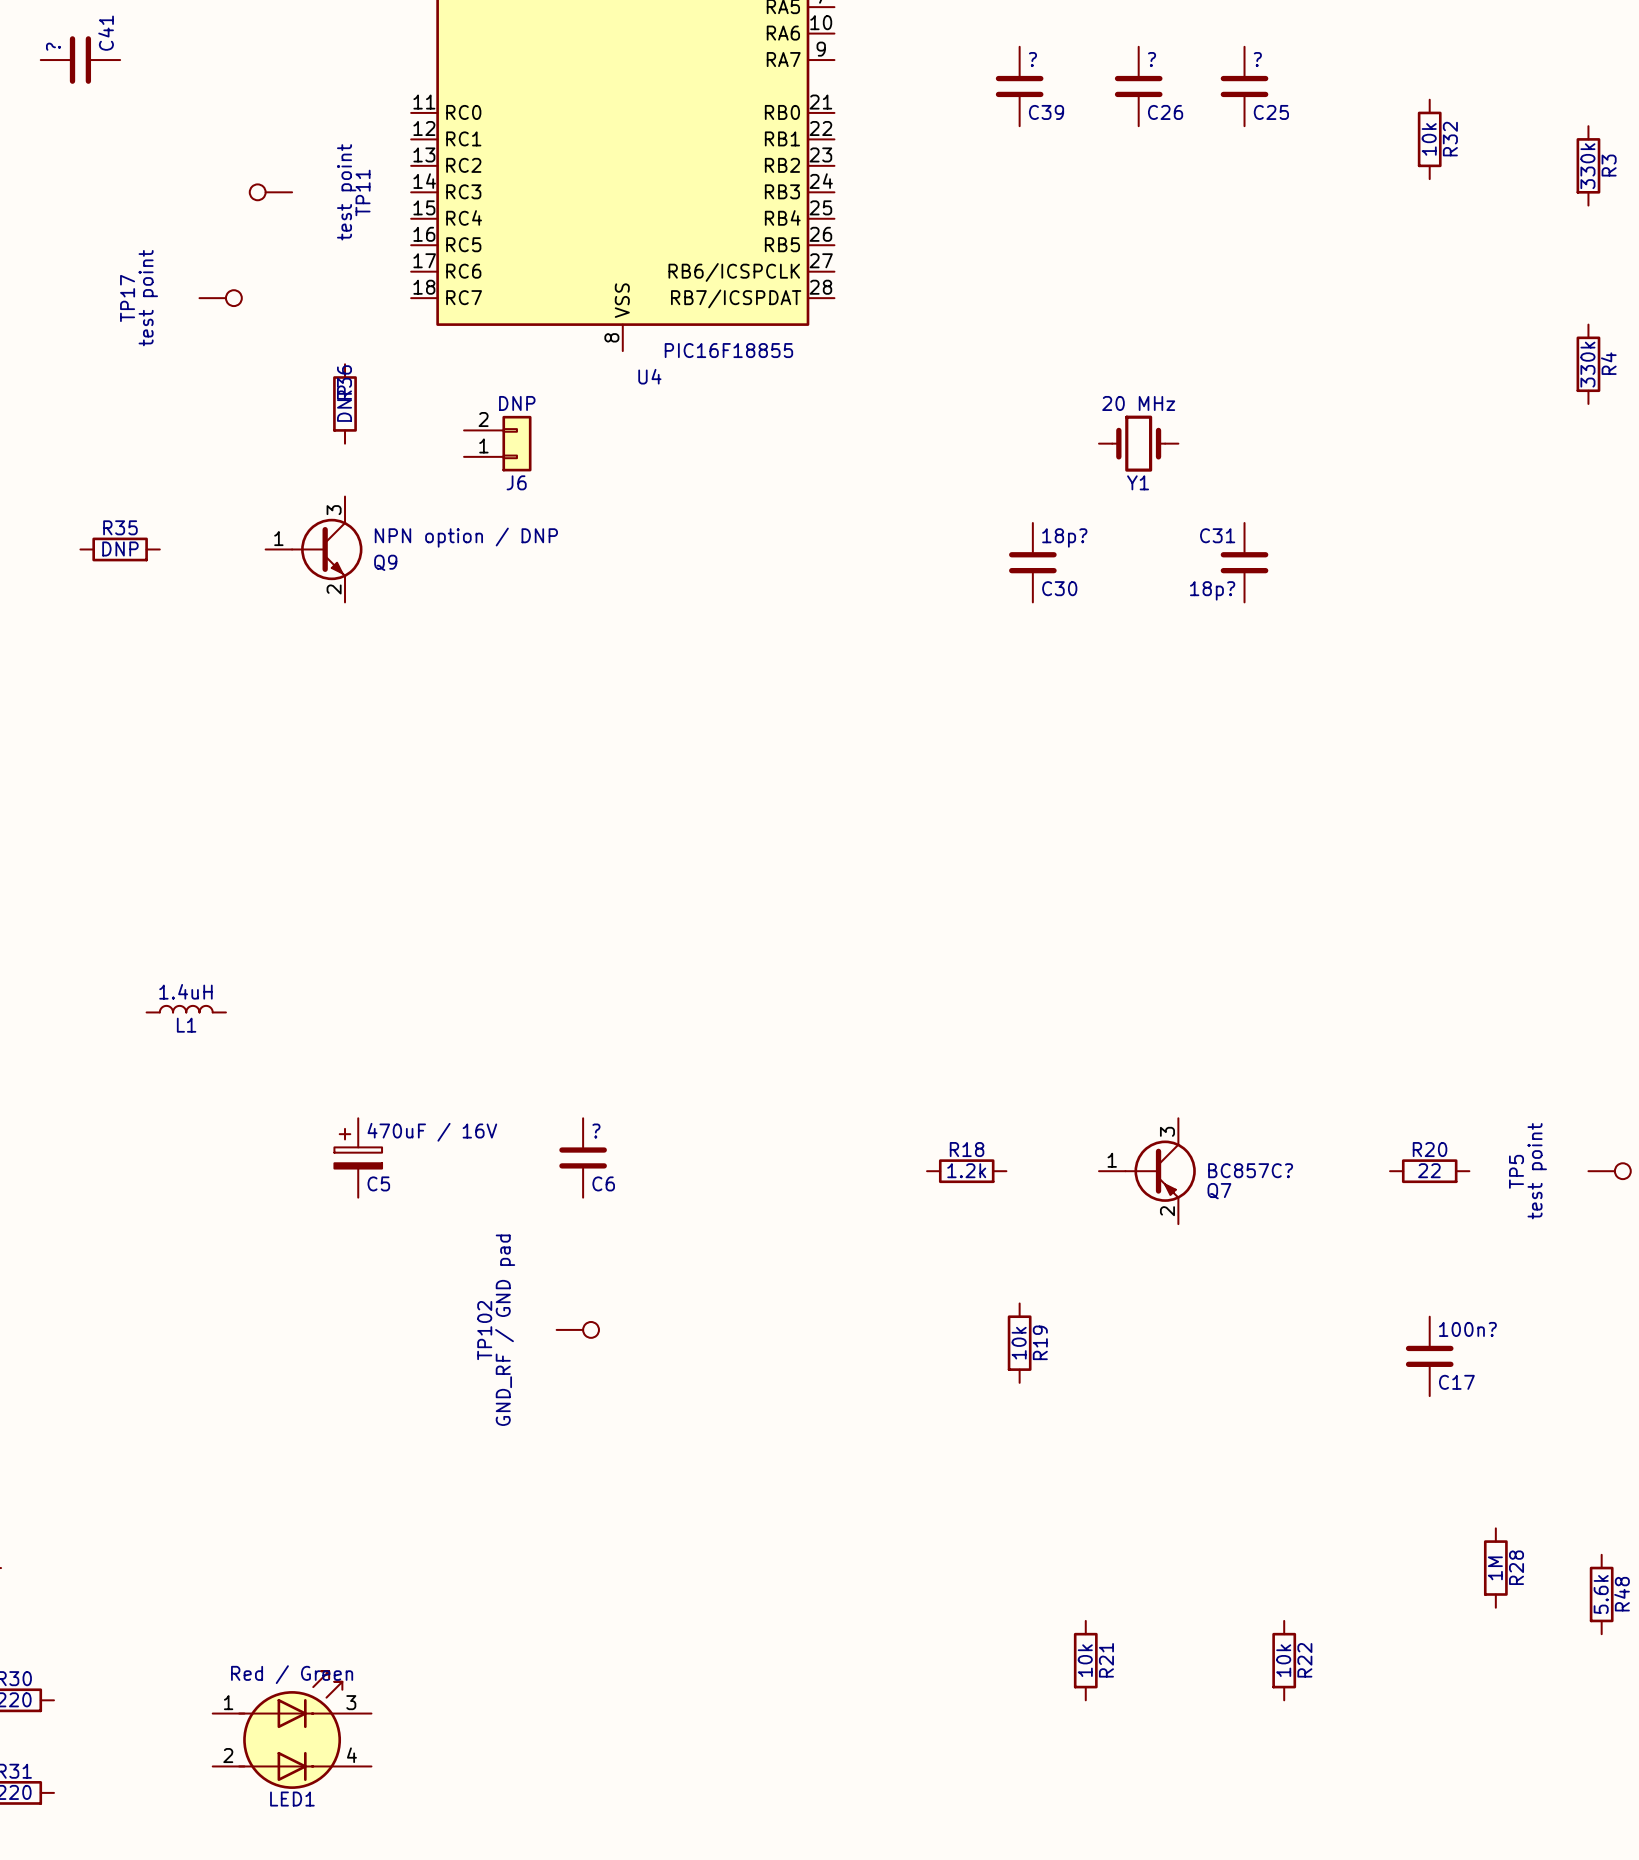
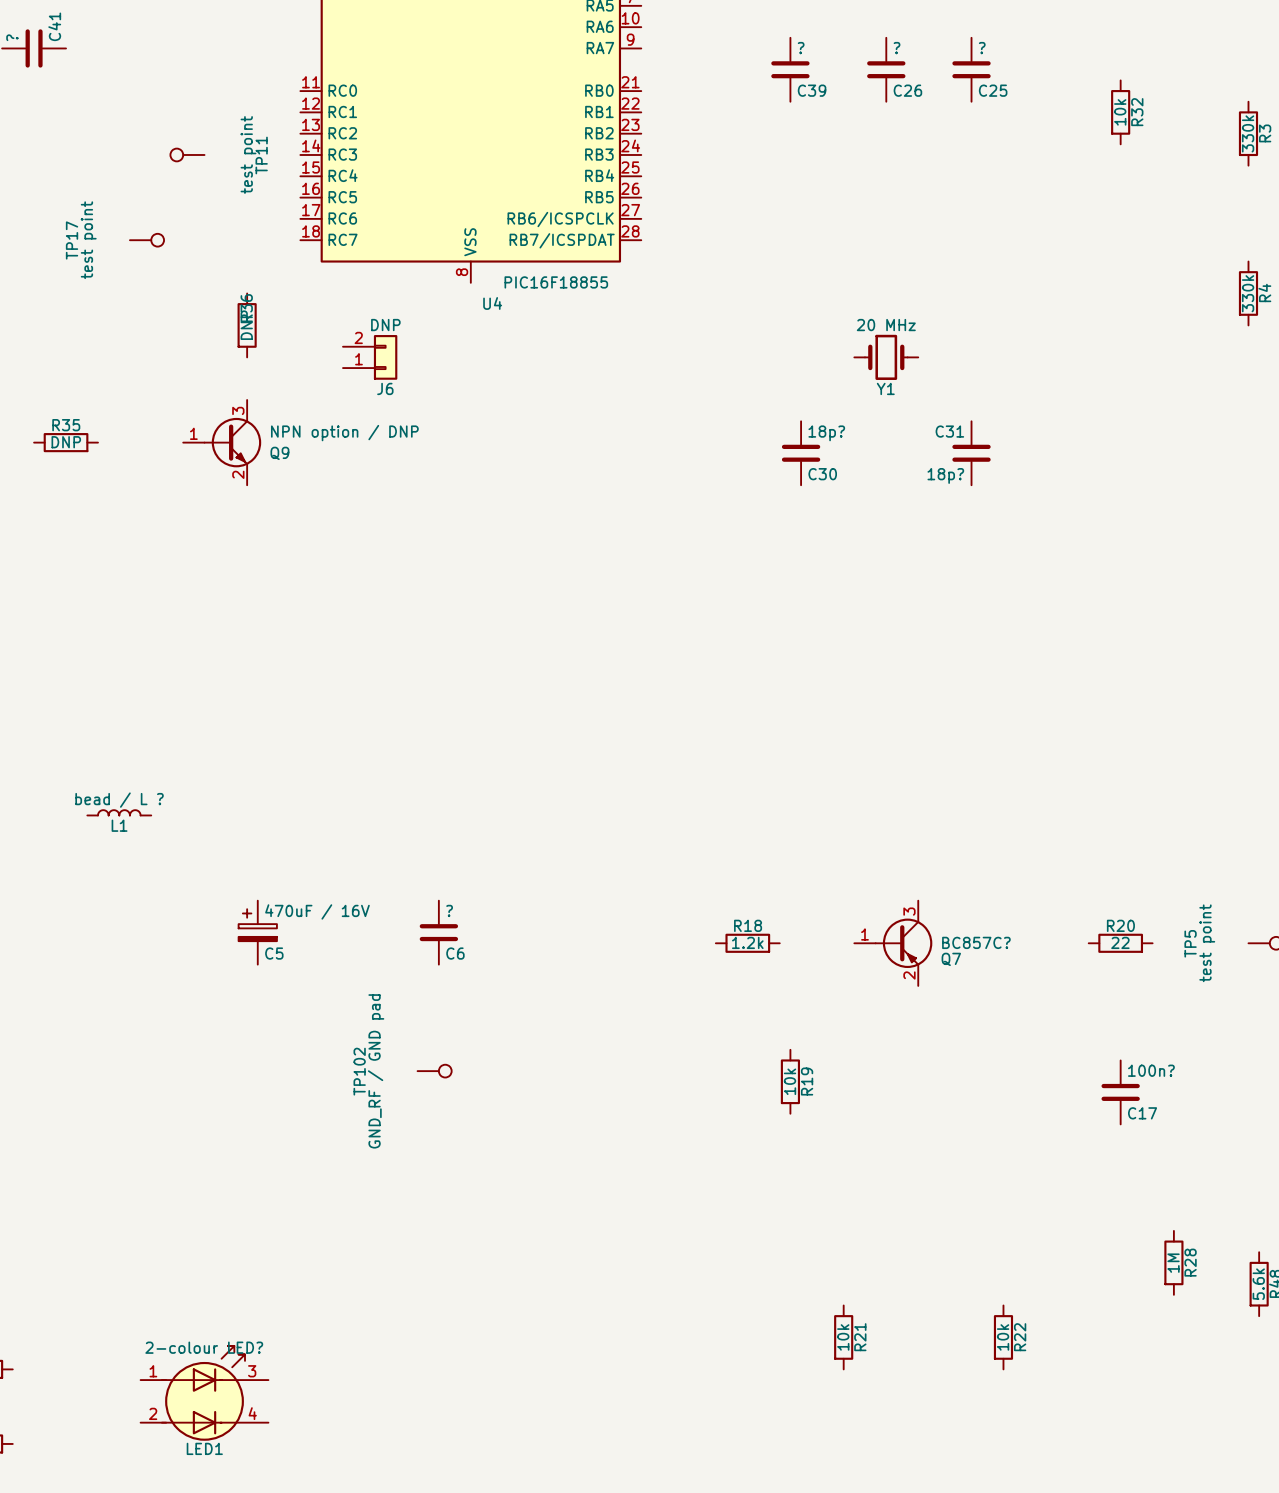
L1 value: 1.4uH (185, 991) -> bead / L ? (119, 800)
LED1 value: Red / Green (292, 1674) -> 2-colour LED? (204, 1347)

